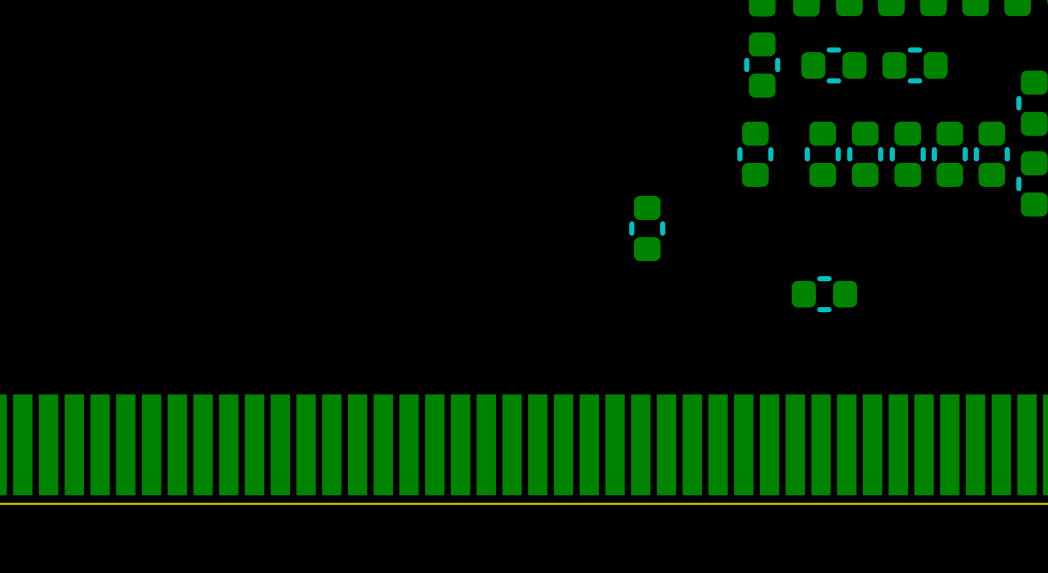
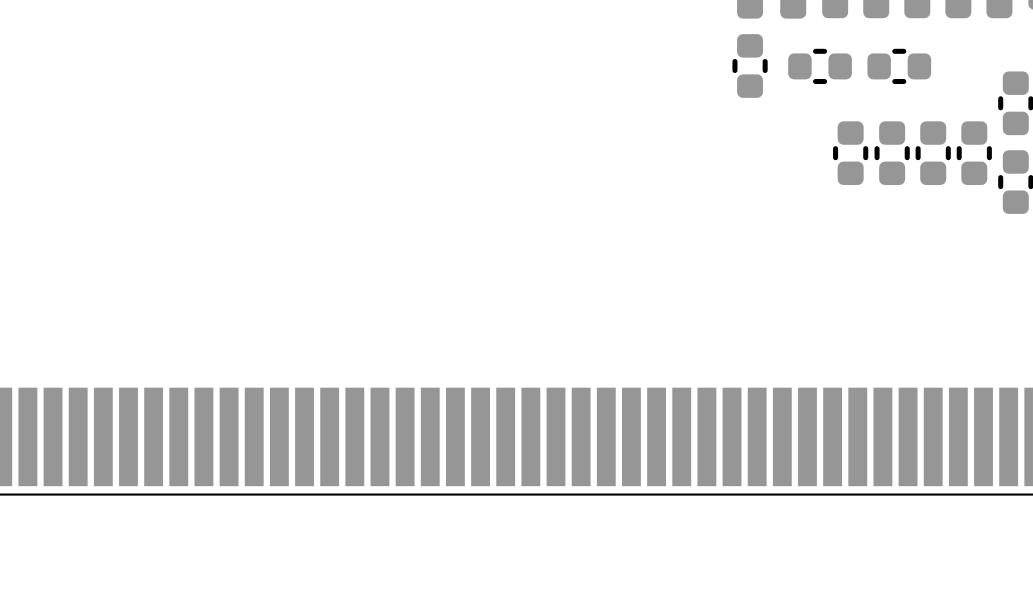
part: (755, 154) -> none
part: (822, 154) -> none
part: (647, 228) -> none
part: (824, 294) -> none

